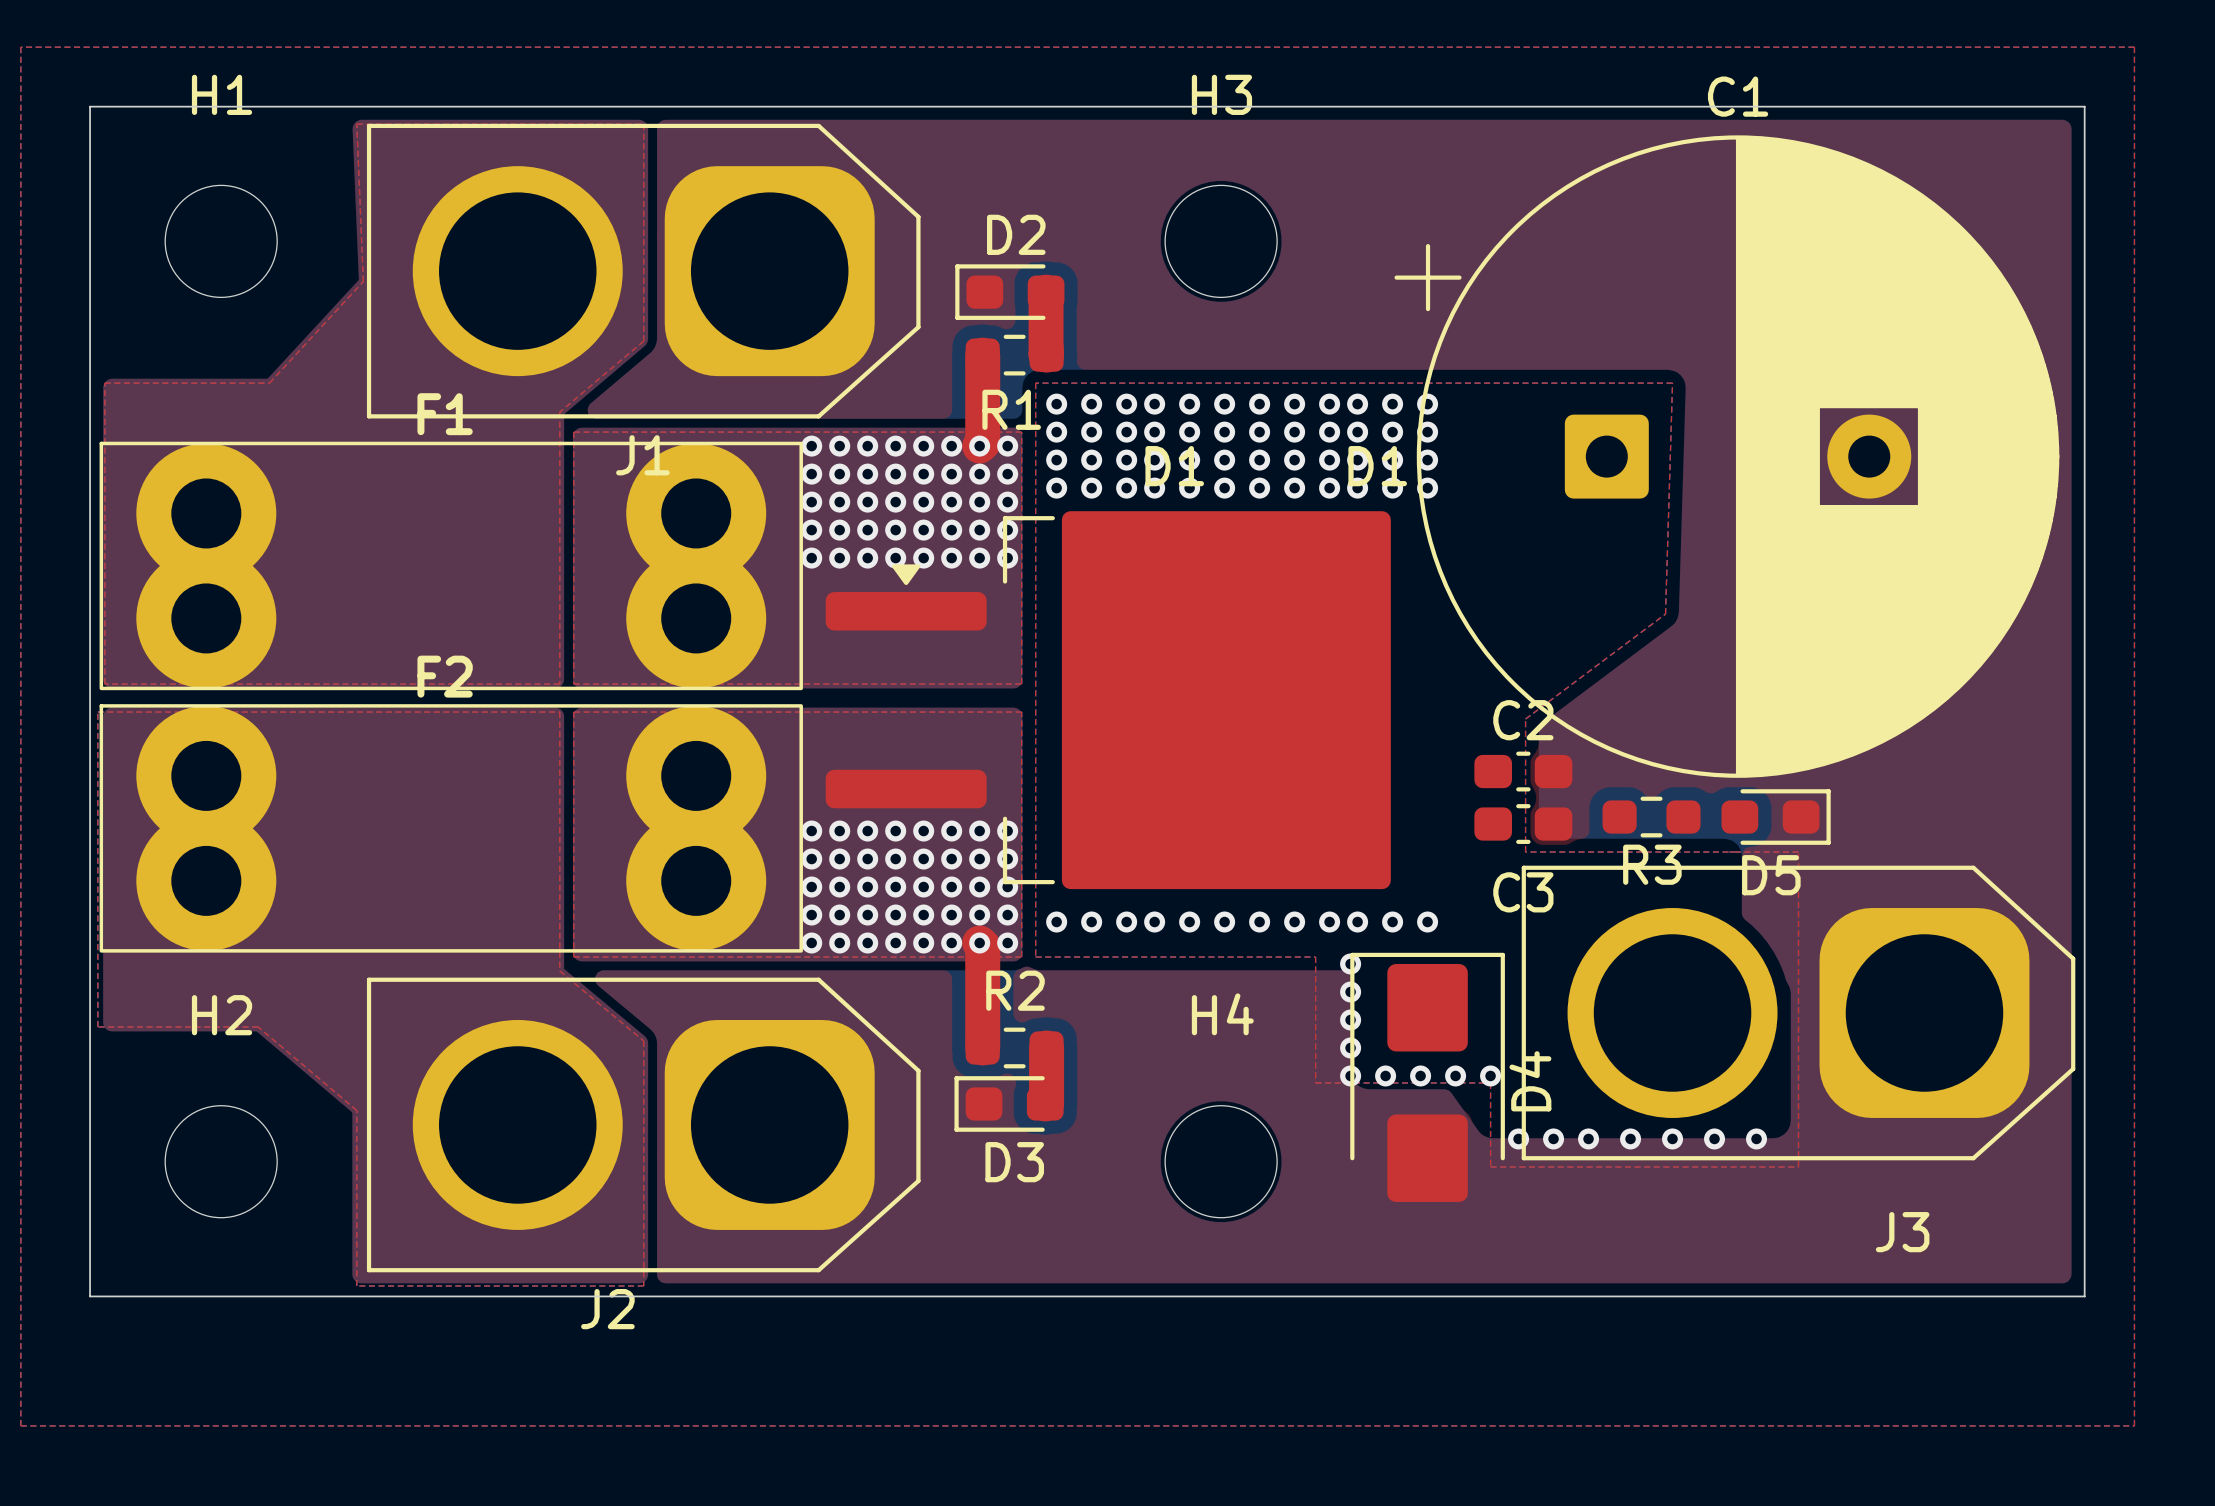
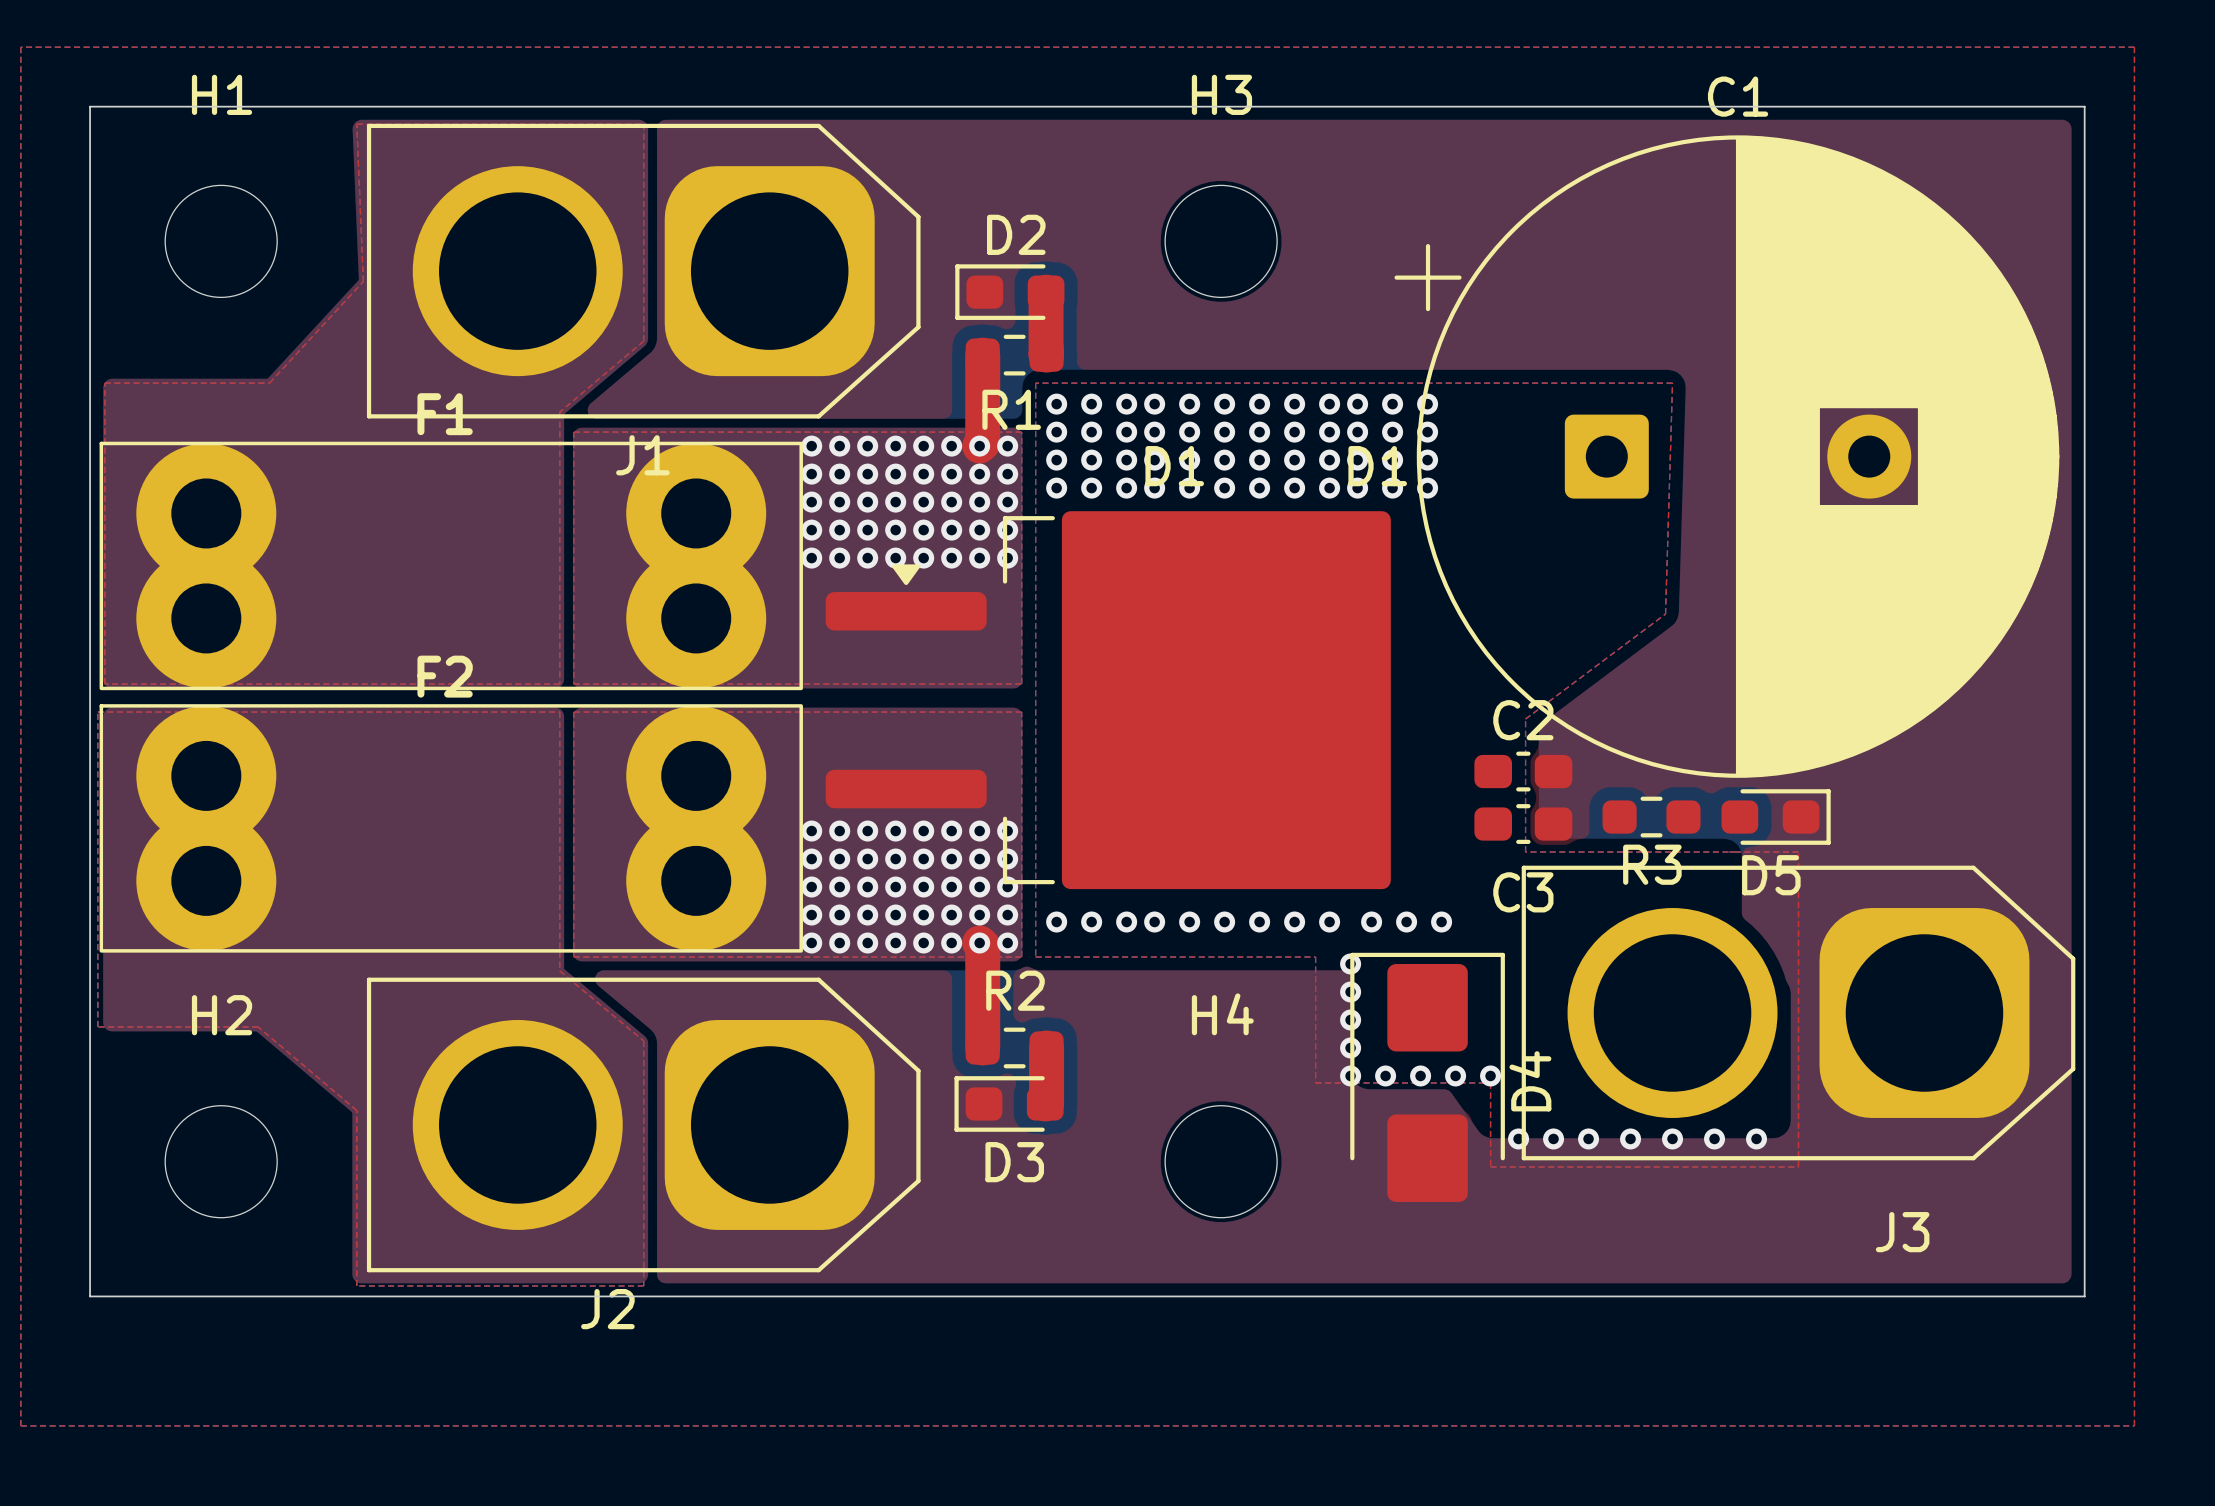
via position: (1357, 922) -> (1371, 922)
via position: (1392, 922) -> (1406, 922)
via position: (1427, 922) -> (1441, 922)

